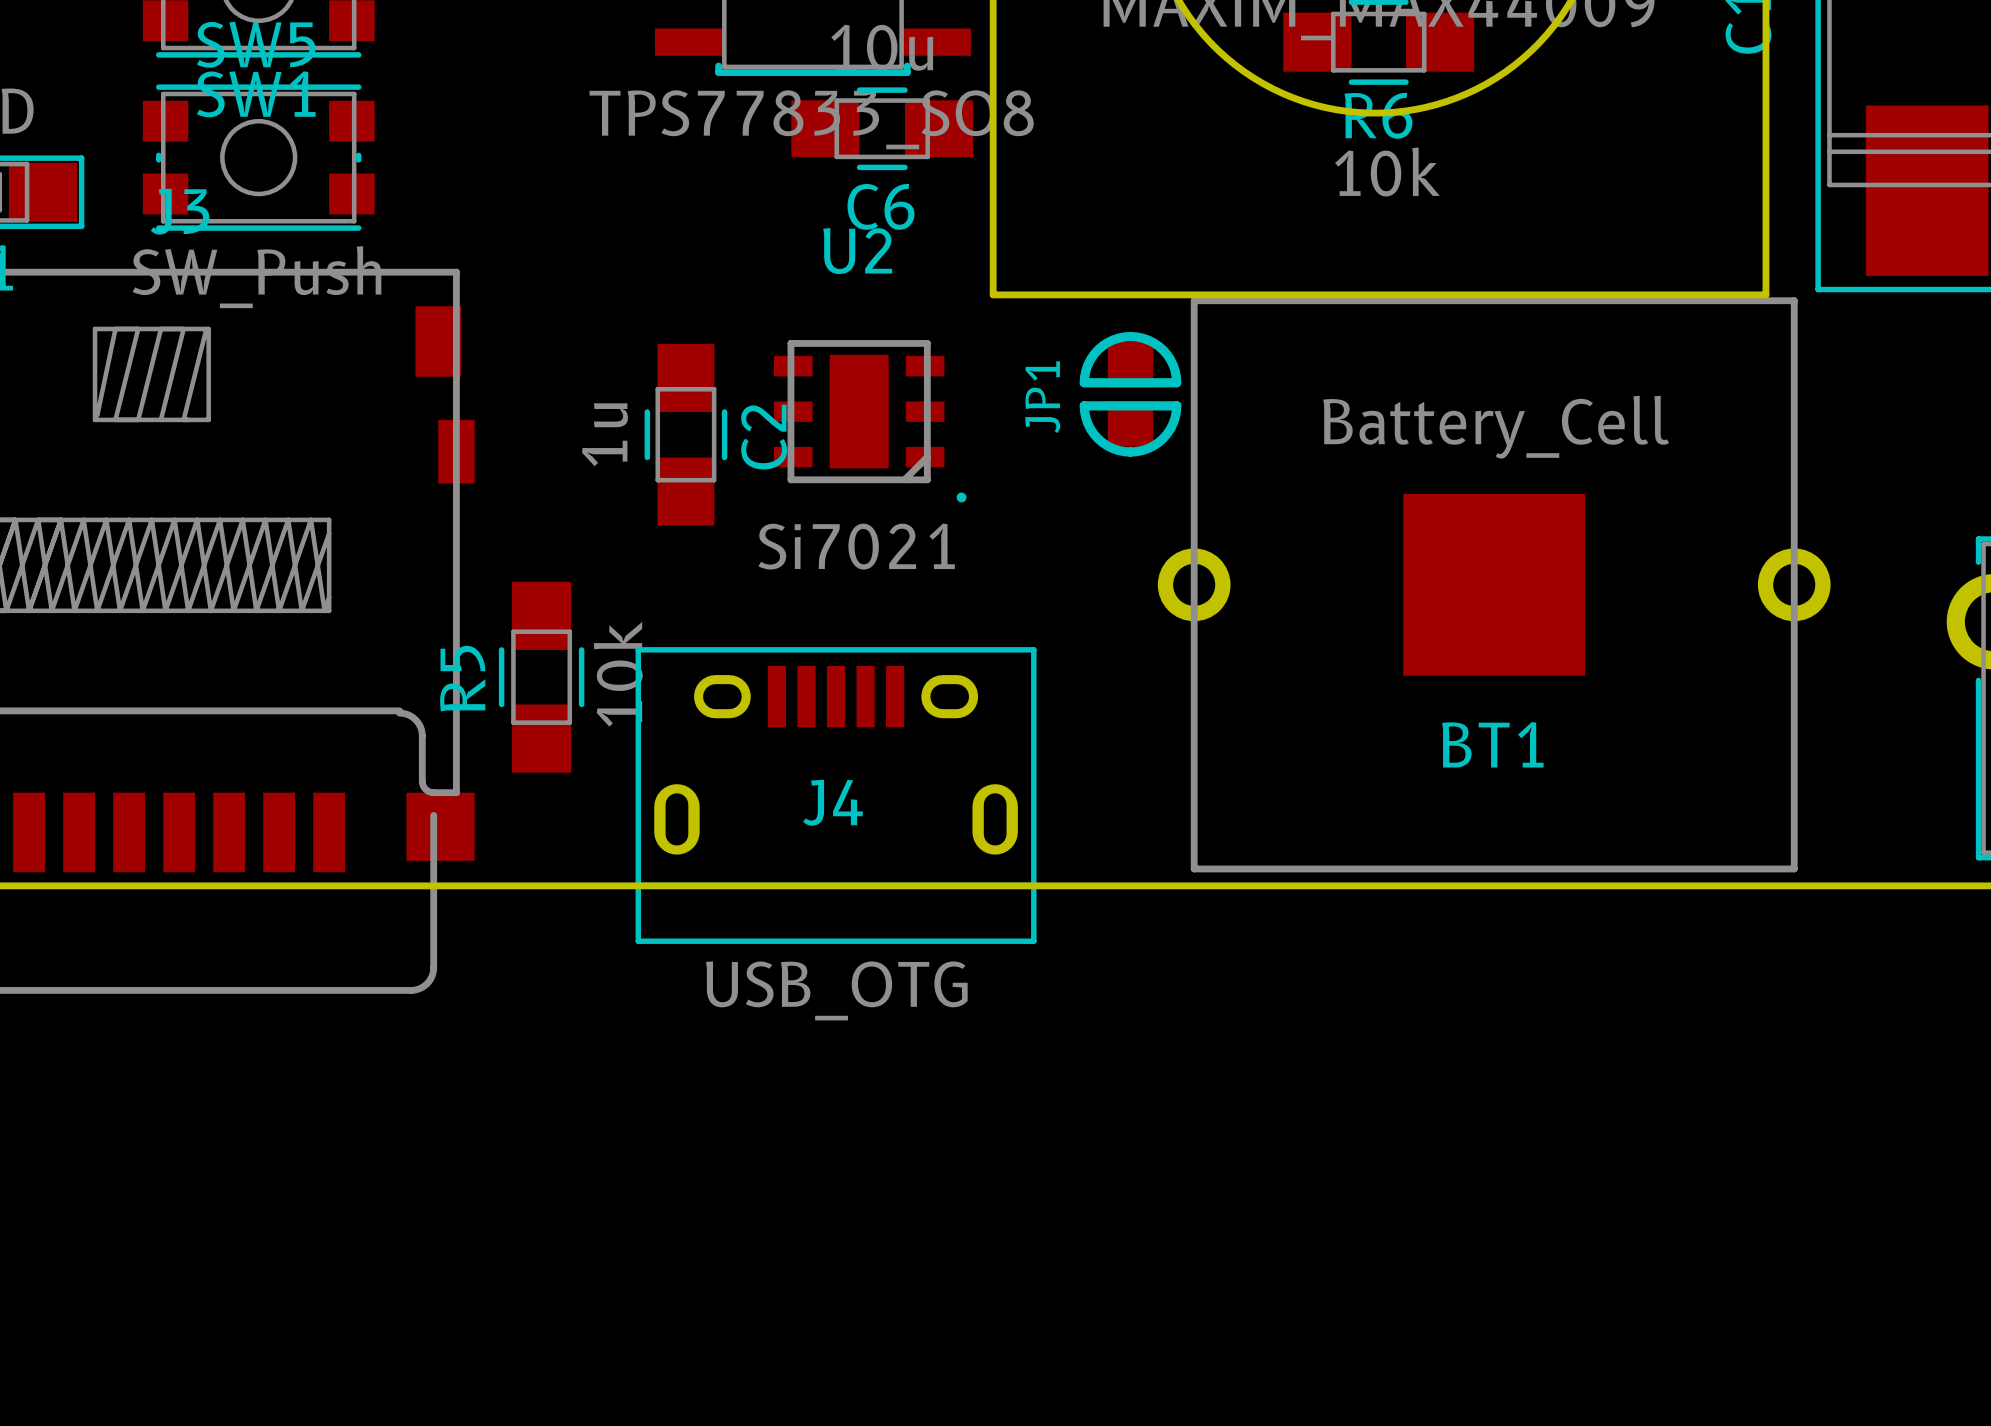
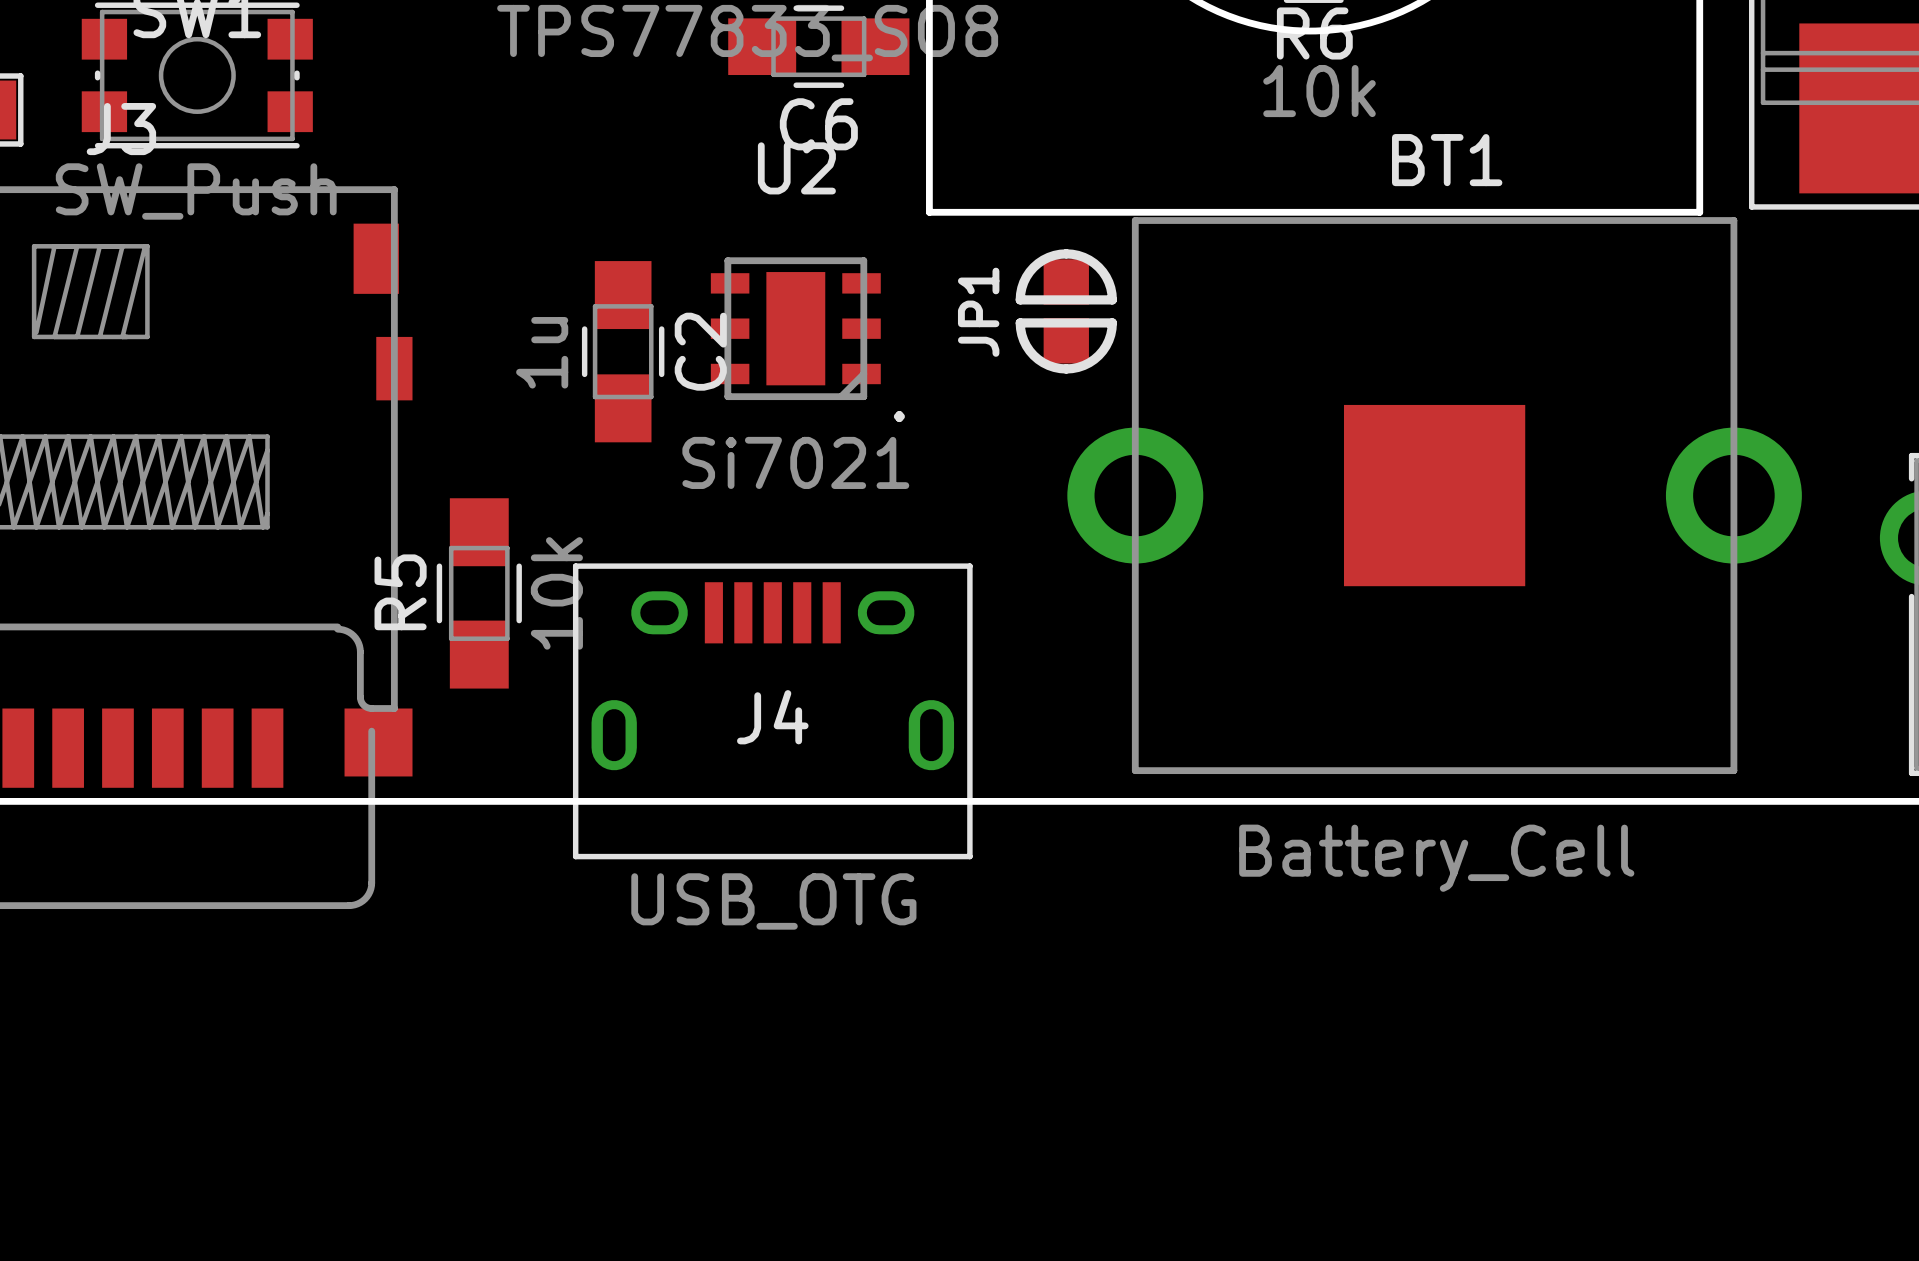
BT1 footprint: [1157, 297, 1831, 873] -> [1067, 217, 1802, 775]
BT1 value position: Battery_Cell (1496, 427) -> Battery_Cell (1436, 858)
BT1 name position: BT1 (1492, 744) -> BT1 (1447, 160)

